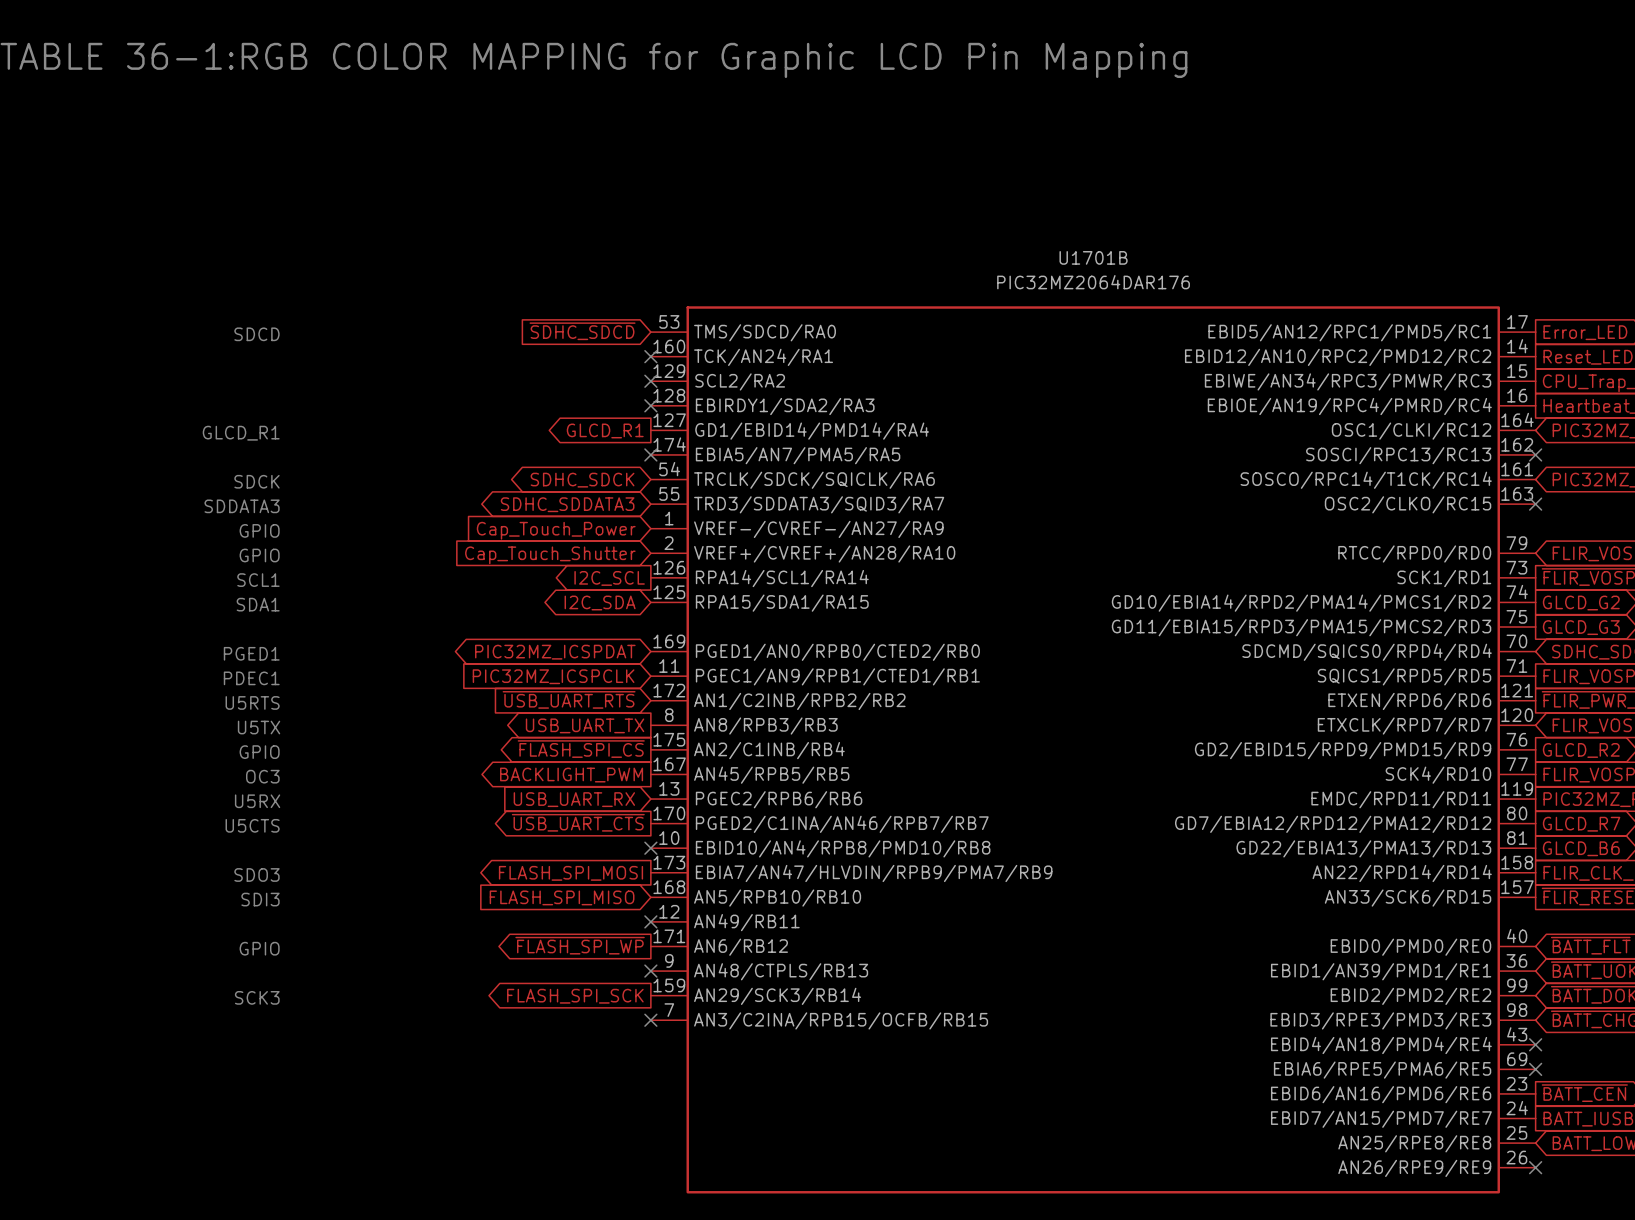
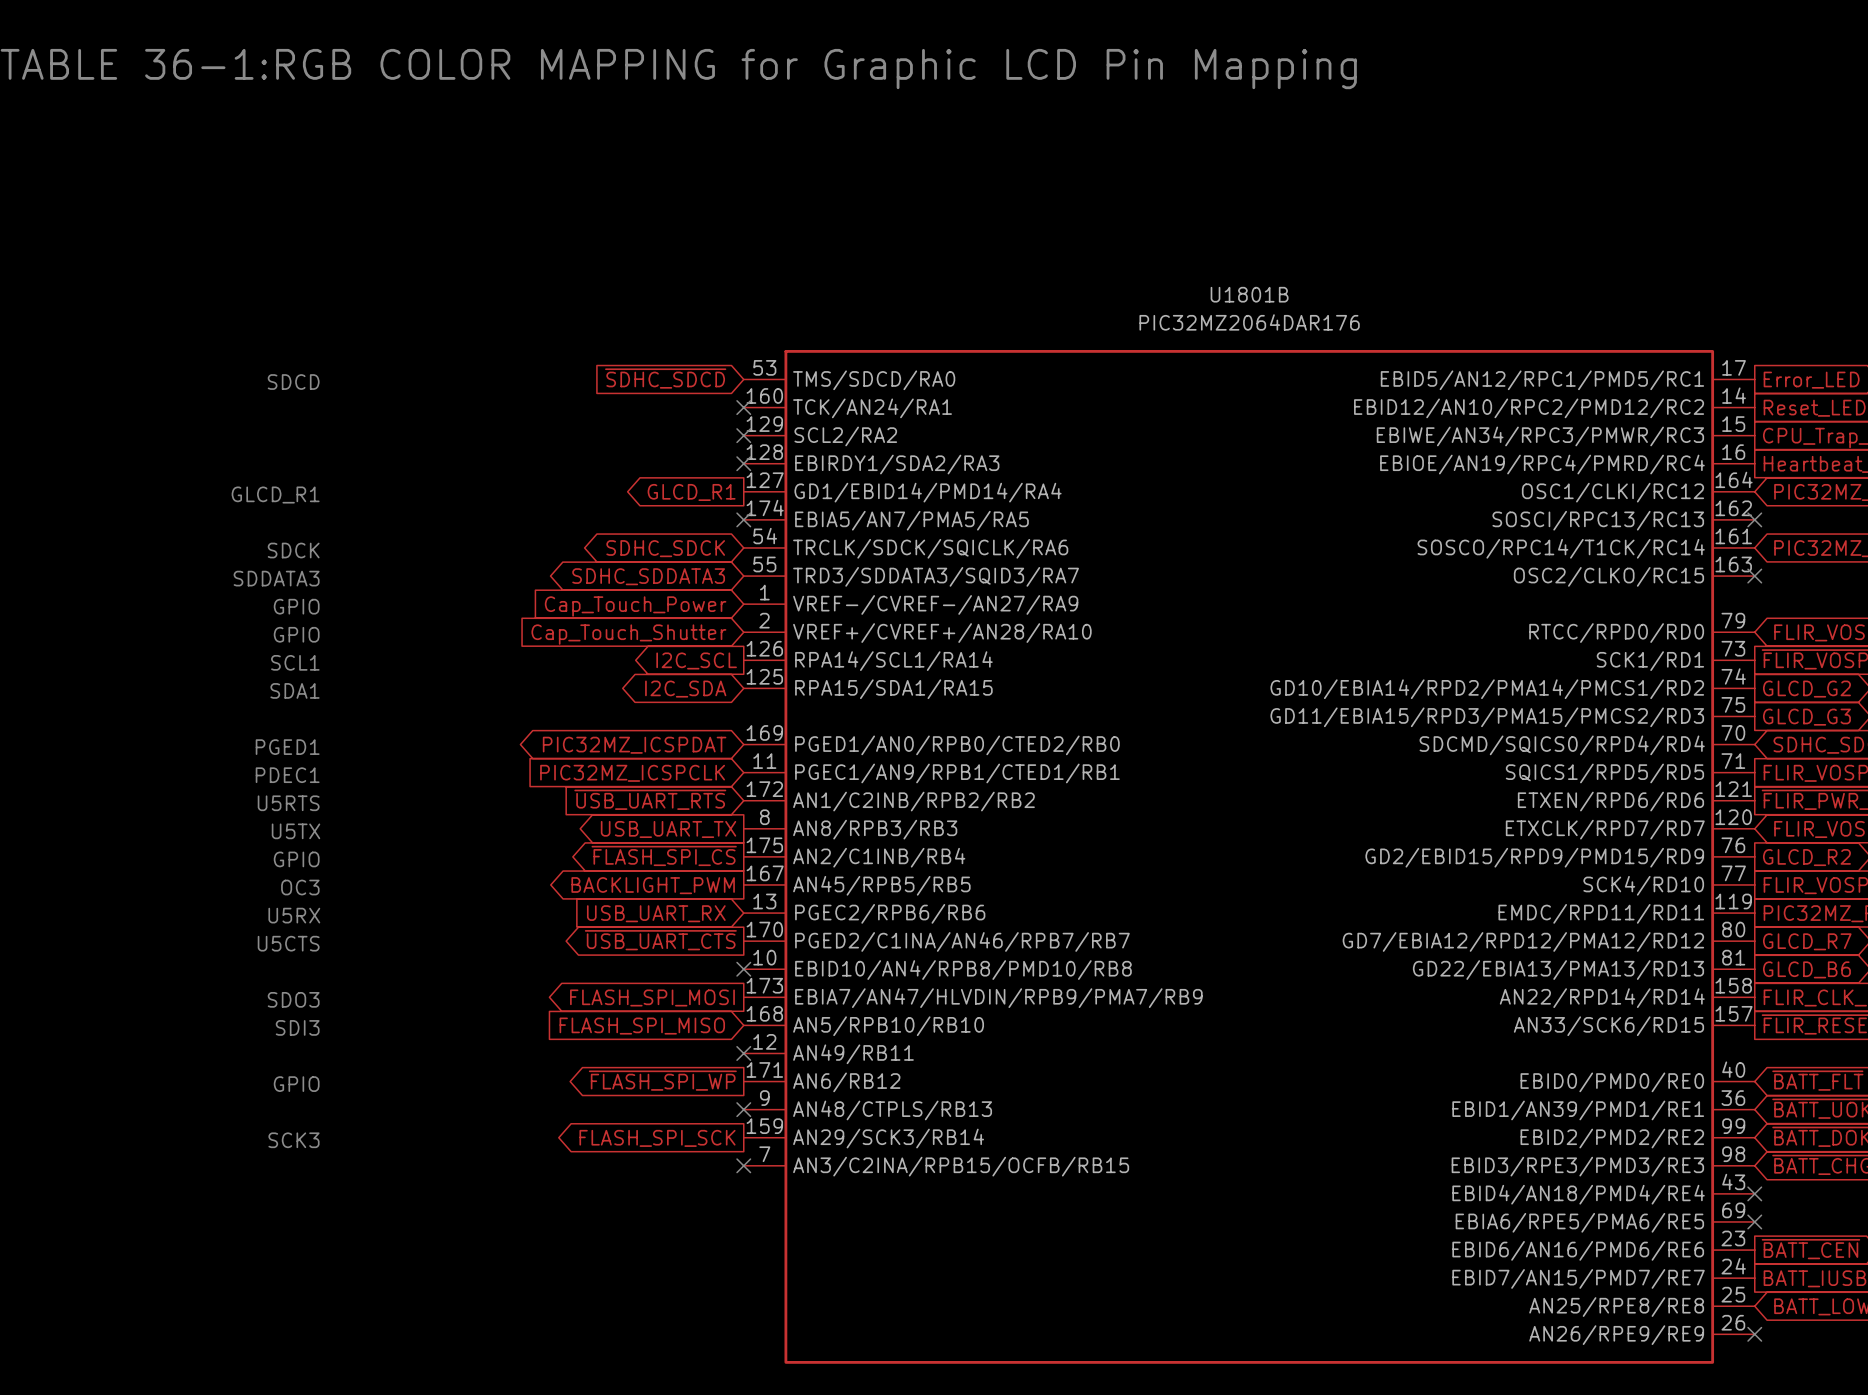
U1701B name: U1701B (1093, 257) -> U1801B (1249, 294)

